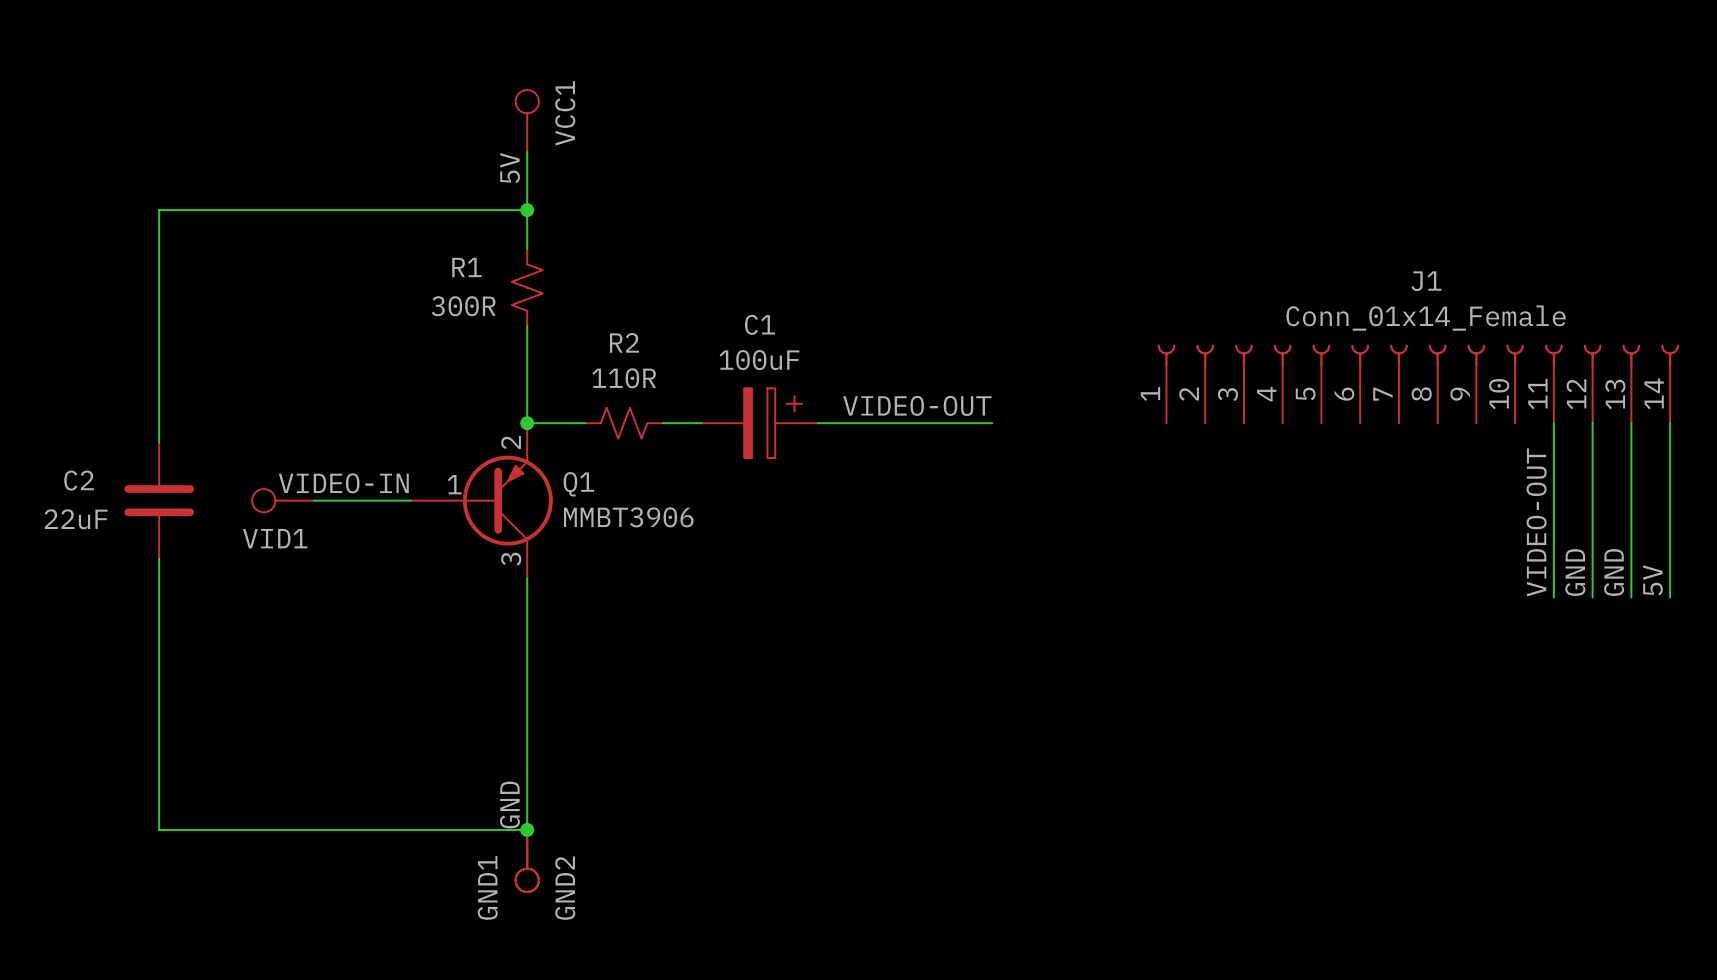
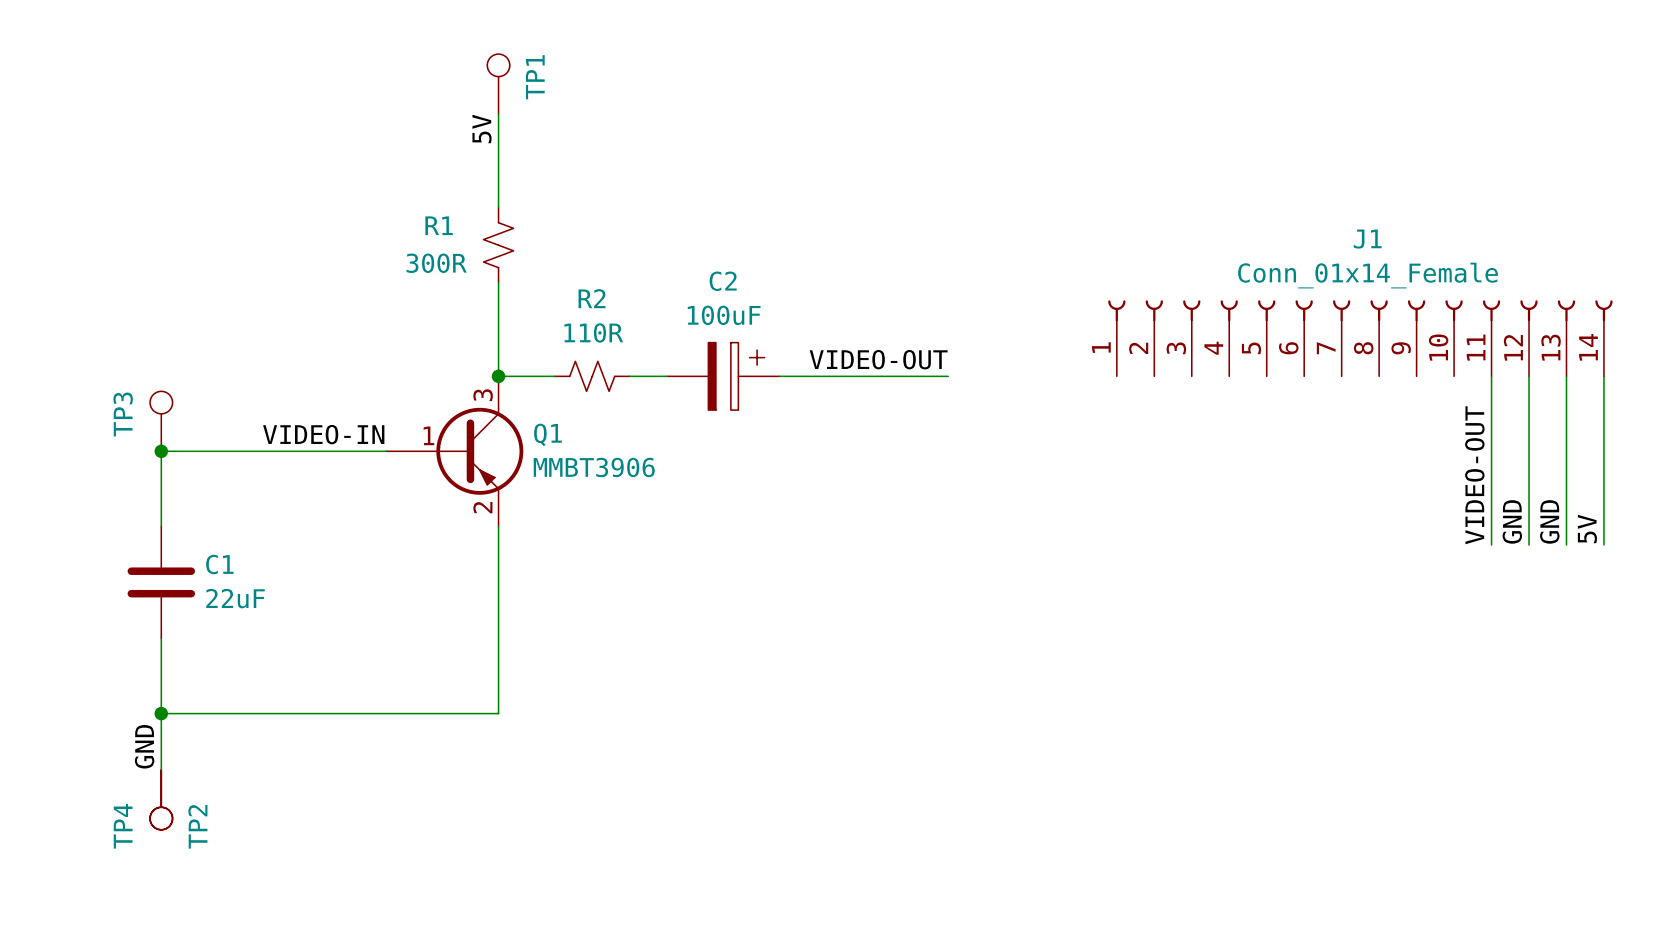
VCC1 name: VCC1 (565, 113) -> TP1 (535, 77)
wire: (527, 210) (159, 210) (159, 442) -> none
junction: (527, 210) -> none
C1 name: C1 (760, 324) -> C2 (723, 281)
TP3: none -> (161, 421)
C2: 22uF (159, 500) -> none
junction: none -> (161, 451)
VID1: (283, 500) -> none
wire: none -> (292, 451) (161, 451) (161, 526)
Q1 flip: as is (507, 500) -> up-down (479, 451)
wire: (159, 558) (159, 829) (527, 829) (527, 771) -> (161, 713) (498, 713)
C1: none -> 22uF (161, 582)
wire: none -> (161, 638) (161, 769)
junction: none -> (161, 713)
label position: GND (509, 804) -> GND (144, 746)
junction: (527, 829) -> none
TP2: none -> (161, 799)
TP4: none -> (161, 799)
GND2: (527, 860) -> none
GND1: (527, 860) -> none

